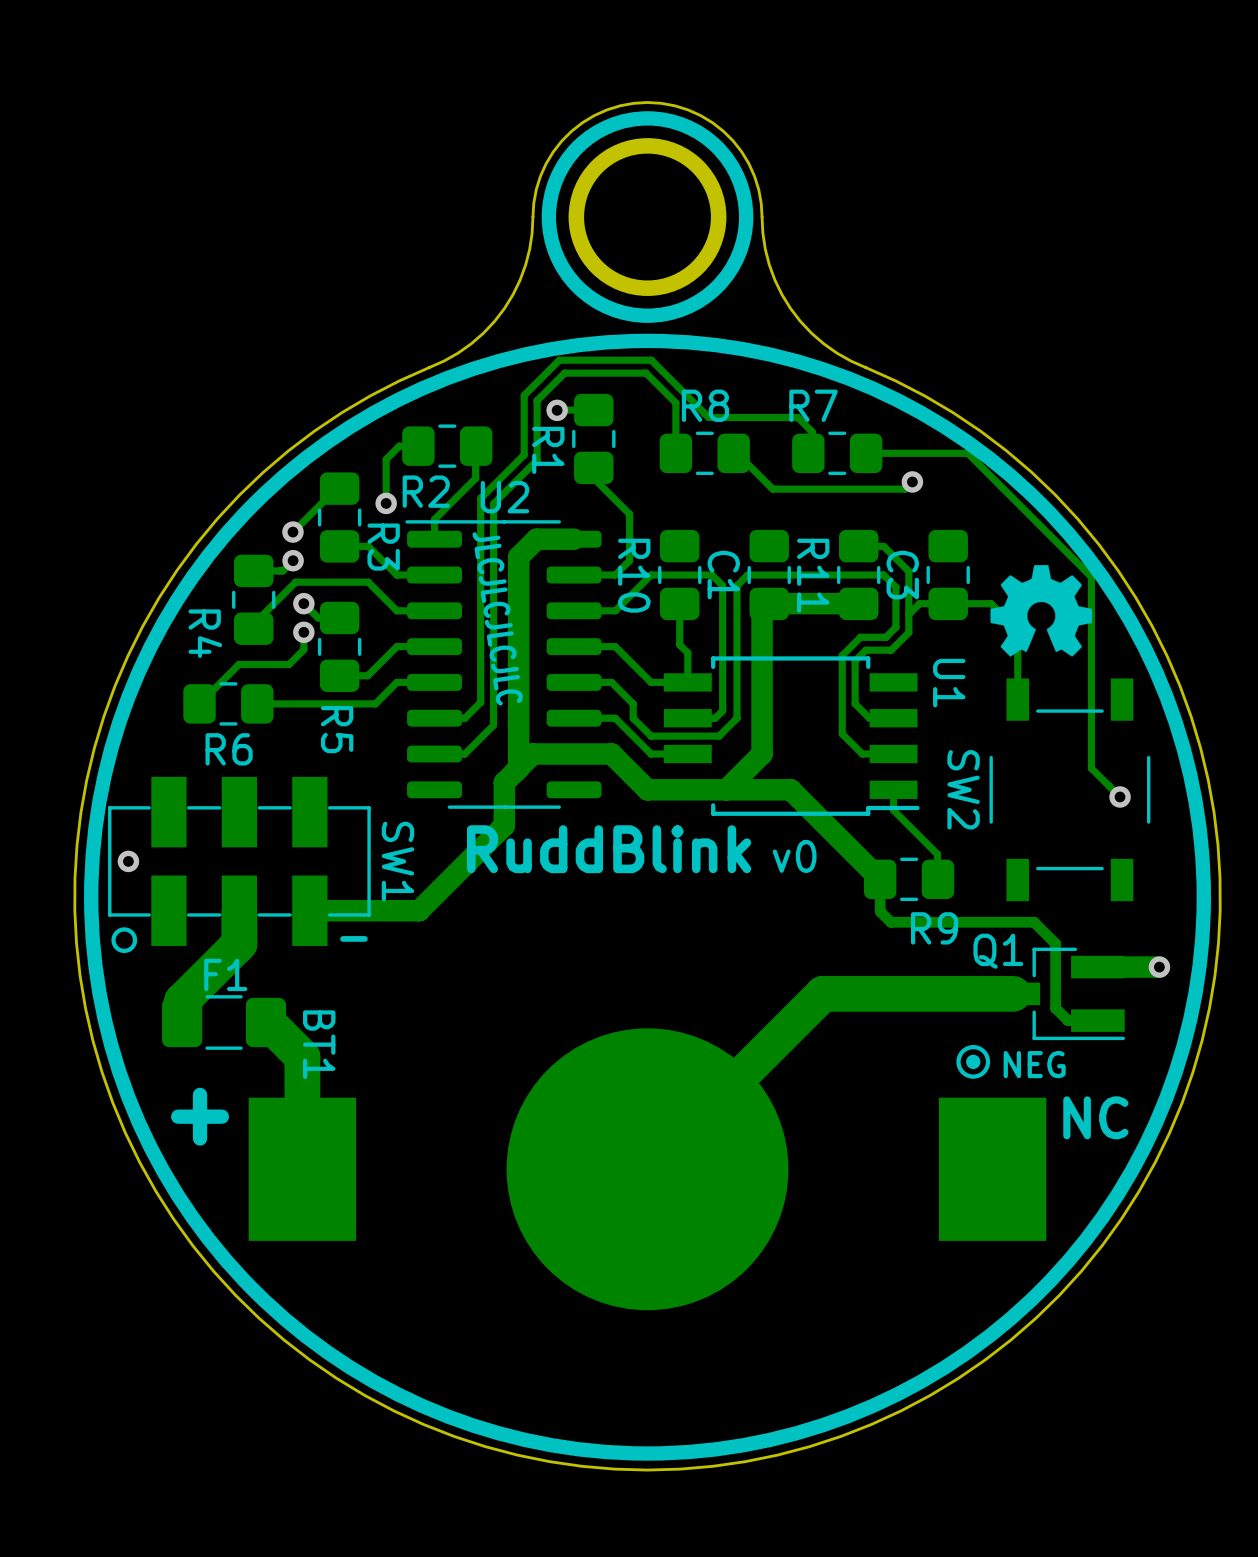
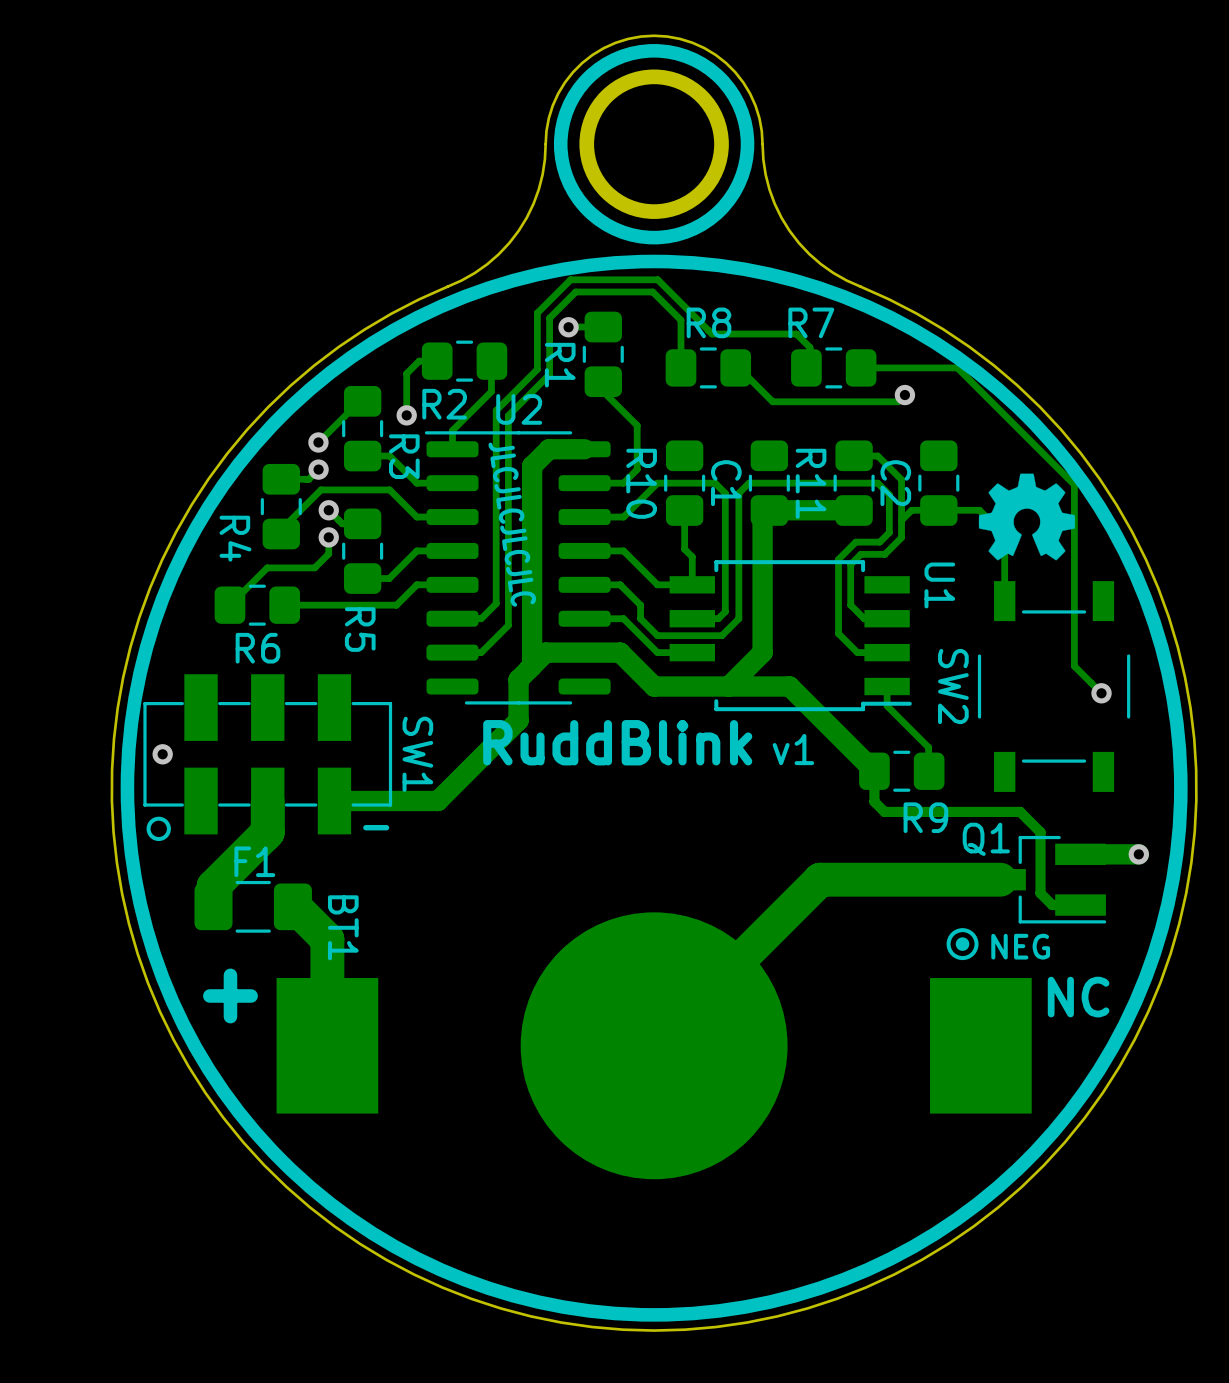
C3 name: C3 (902, 575) -> C2 (895, 483)
text: v0 (794, 856) -> v1 (793, 749)

